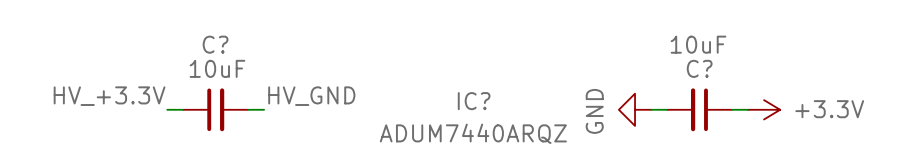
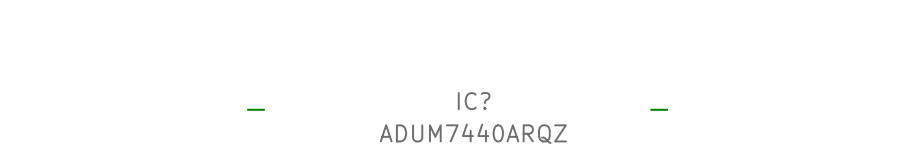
label: HV_+3.3V (109, 96) -> none
label: HV_GND (311, 96) -> none
wire: (167, 109) (183, 109) -> none
C?: 10uF (215, 109) -> none
power symbol: GND (635, 109) -> none
C?: 10uF (699, 109) -> none
wire: (731, 109) (747, 109) -> none
power symbol: +3.3V (764, 109) -> none

